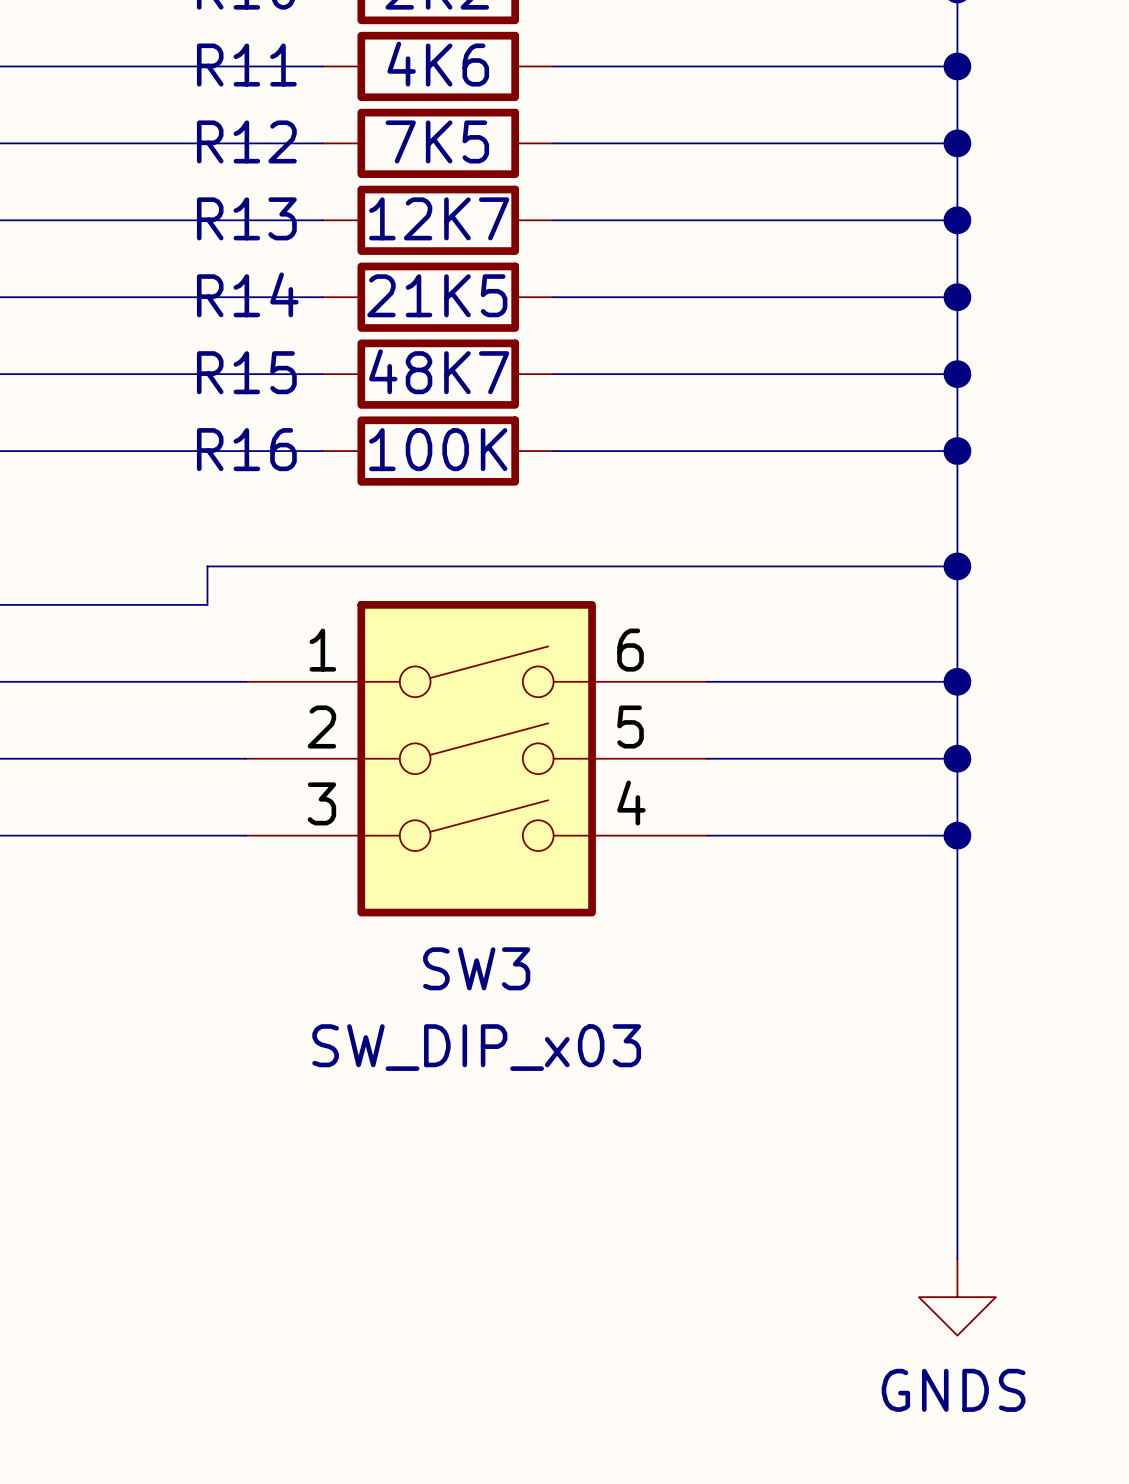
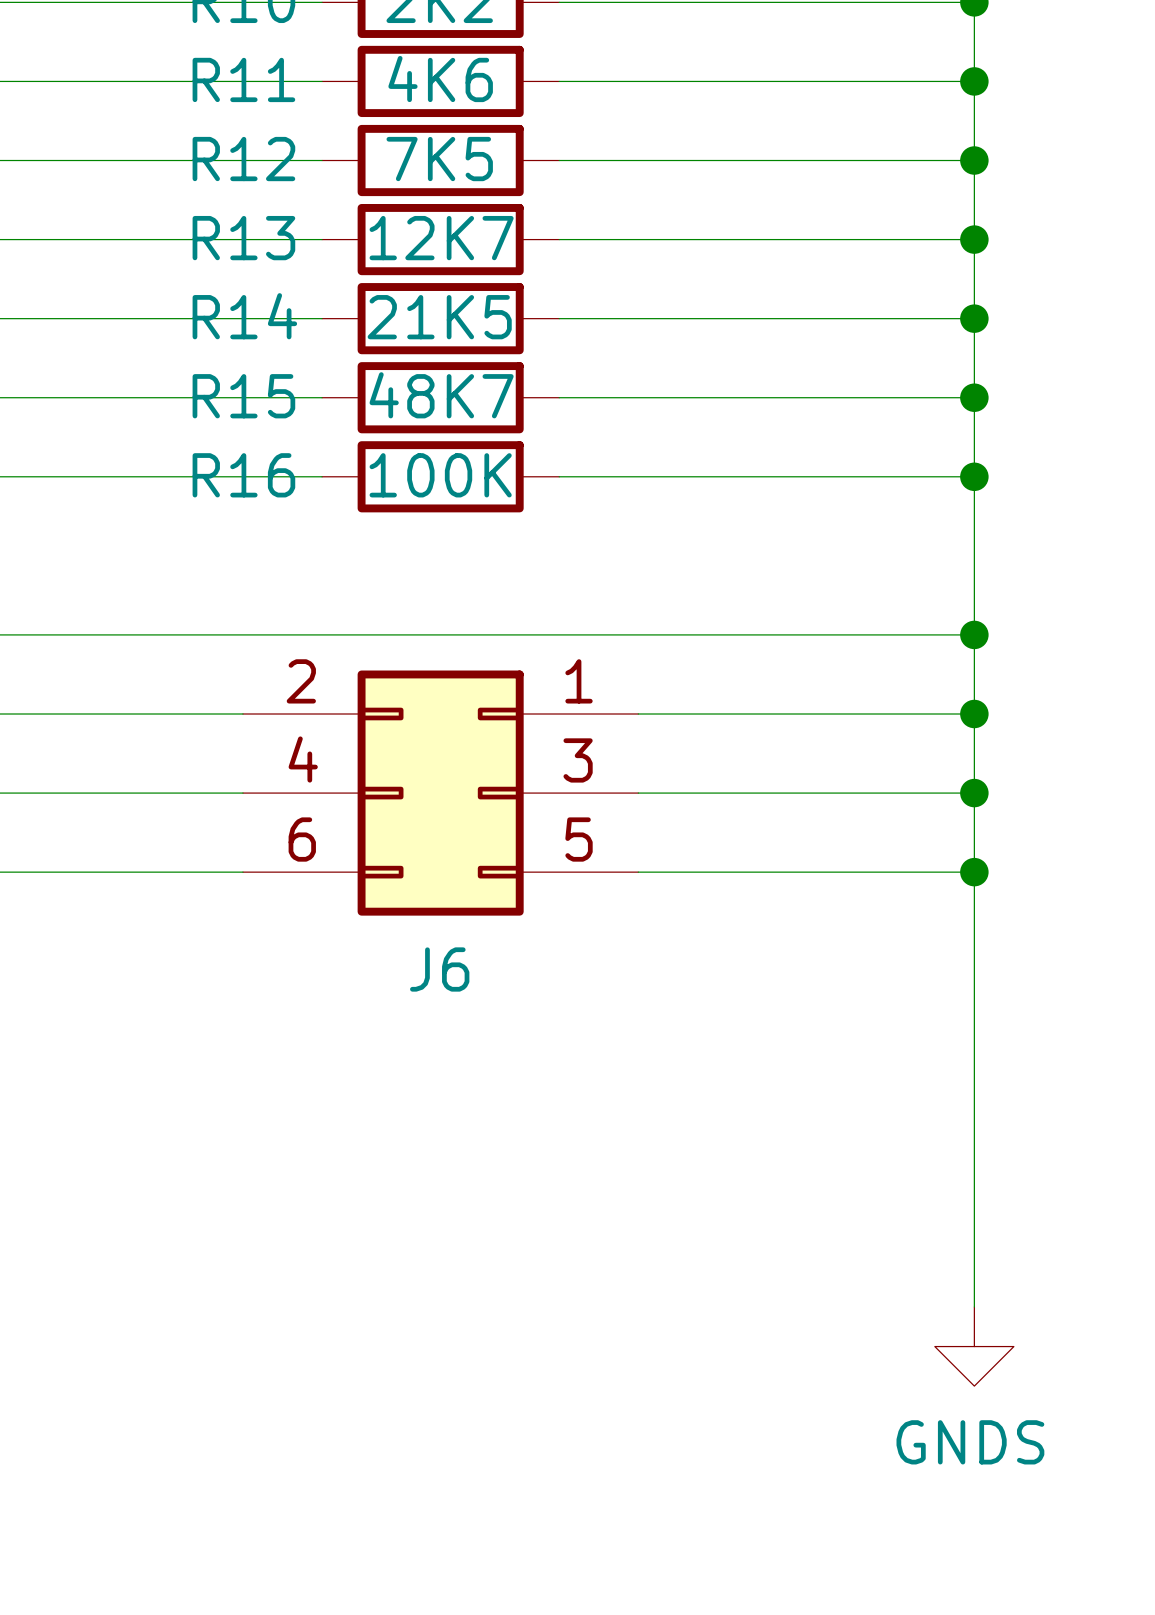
wire: (957, 566) (207, 566) (207, 604) -> (974, 634) (203, 634)
junction position: (957, 566) -> (974, 634)
J6: none -> (440, 793)
SW3: SW_DIP_x03 (476, 758) -> none

